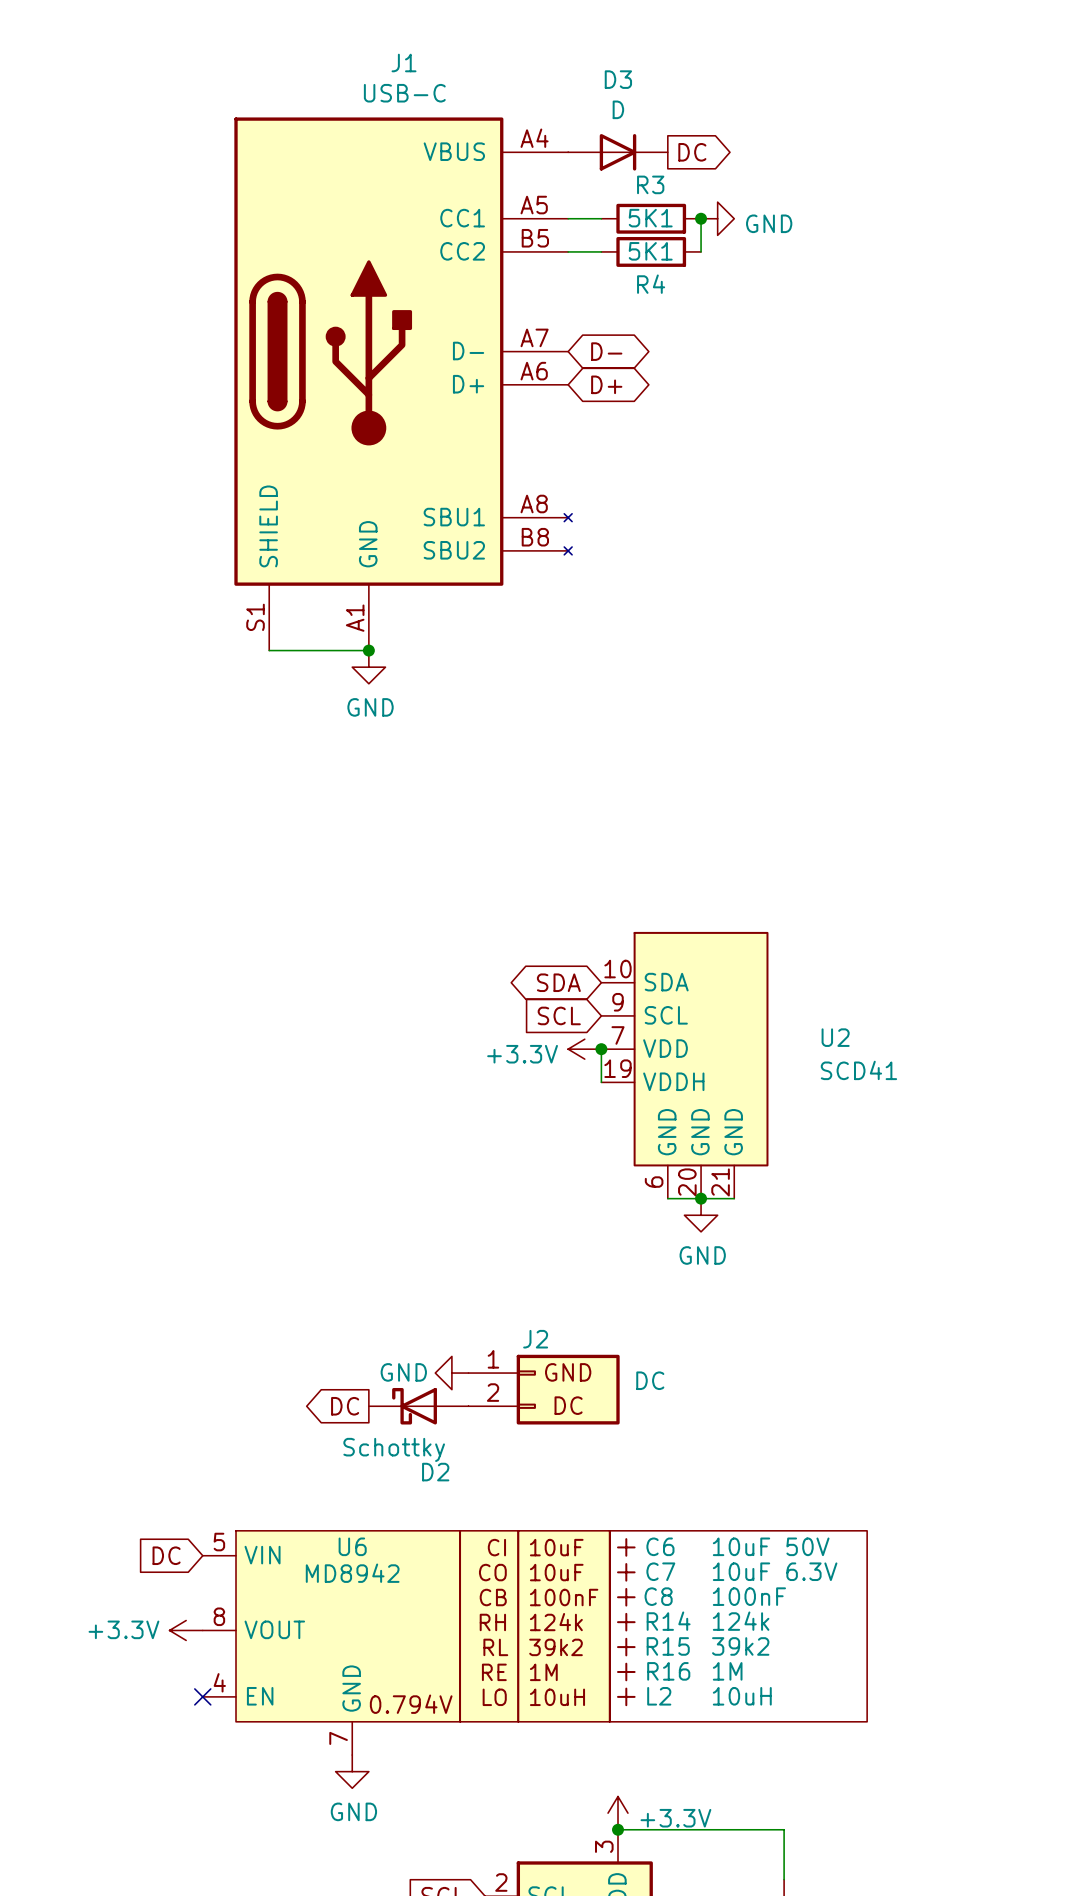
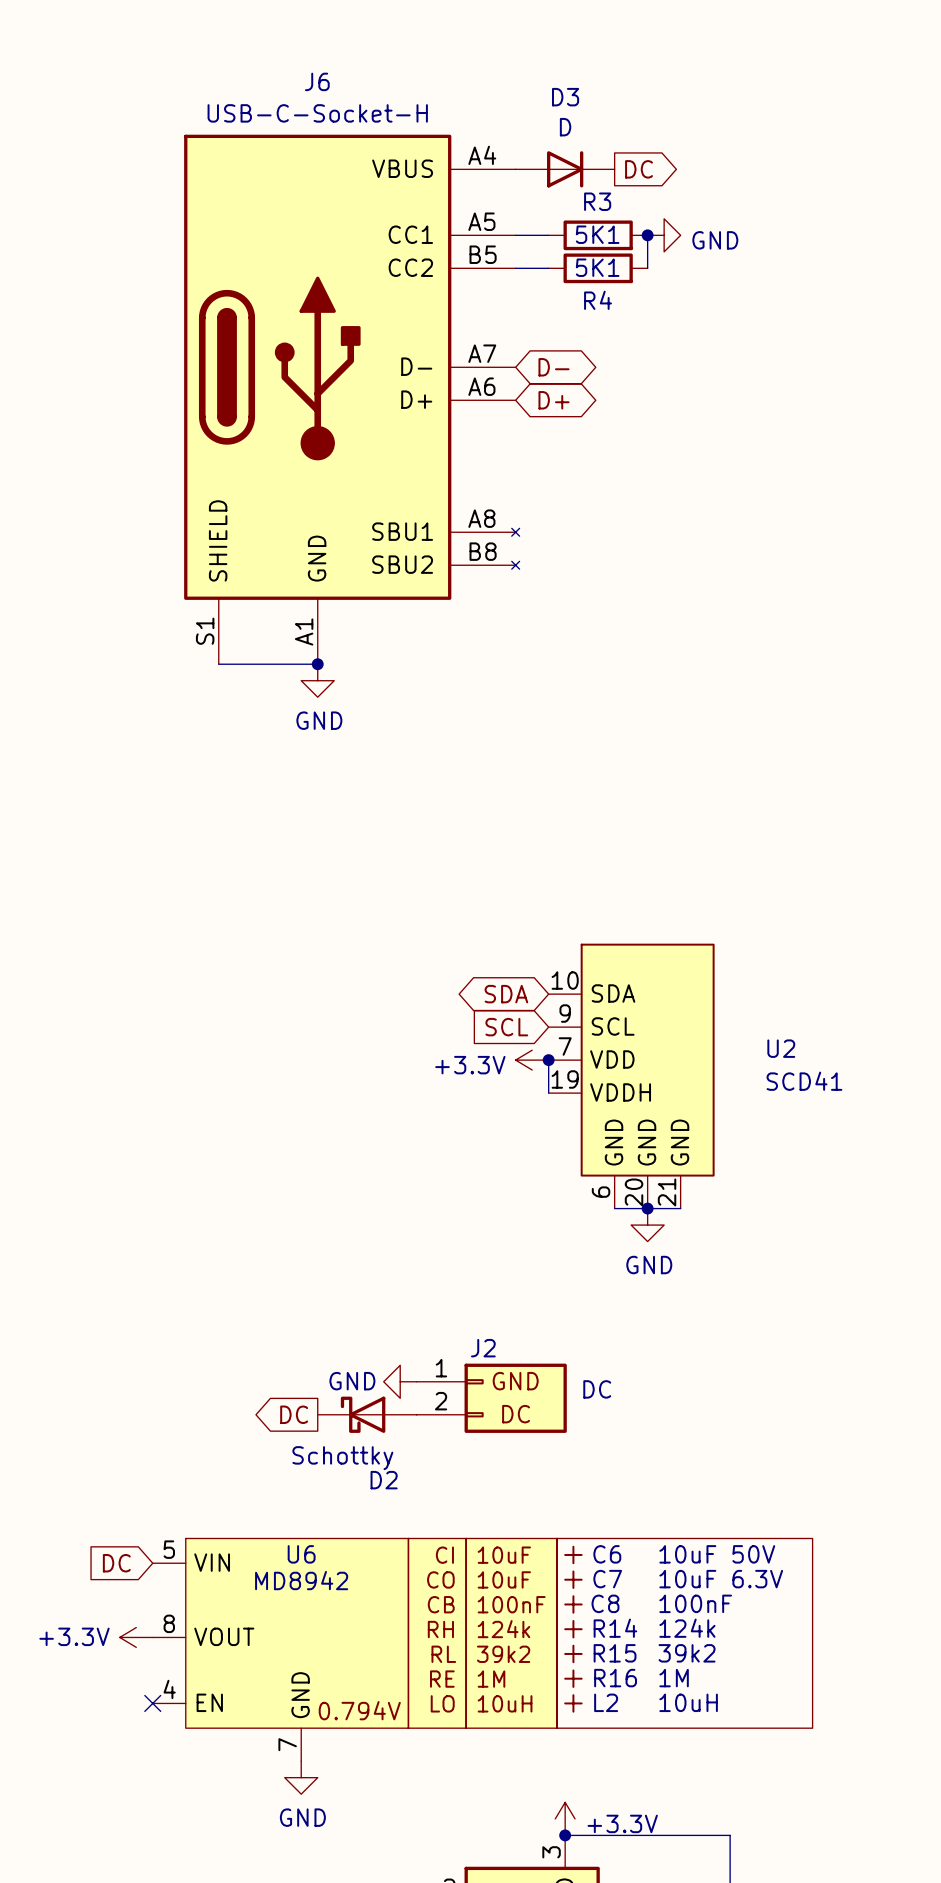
J1 name: J1 (404, 62) -> J6 (317, 81)
J1 value: USB-C (404, 93) -> USB-C-Socket-H (317, 113)

